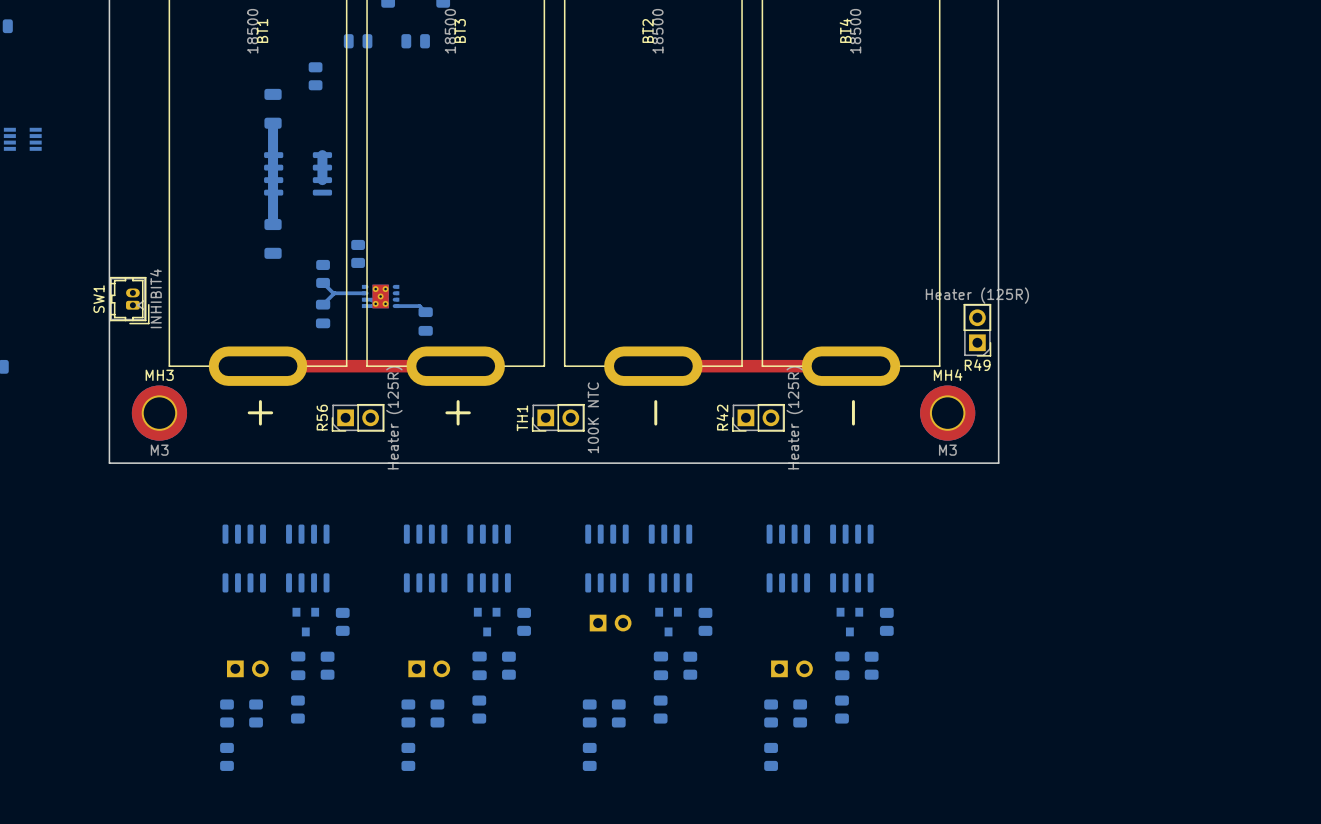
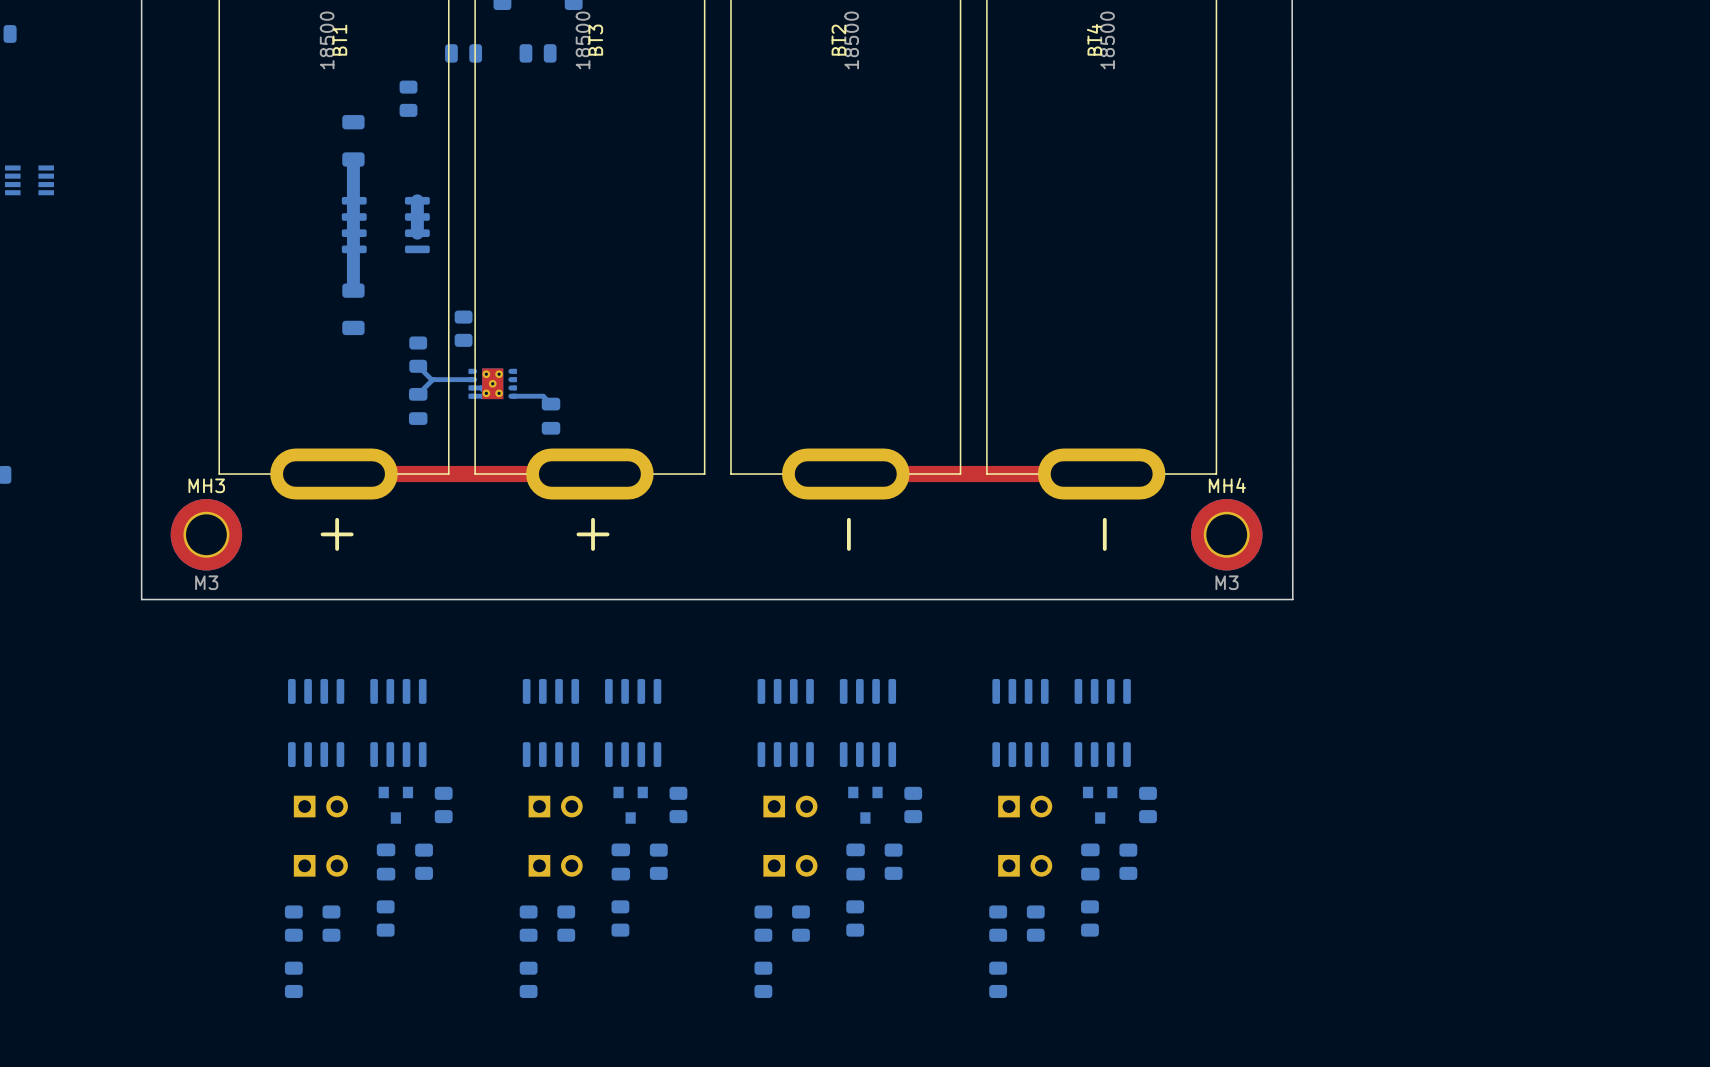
SW1: INHIBIT4 (129, 300) -> none
R49: Heater (125R) (977, 330) -> none
R56 side: top (358, 417) -> bottom (320, 806)
TH1 side: top (558, 417) -> bottom (555, 806)
R42: Heater (125R) (758, 417) -> none
part: none -> (1025, 806)
part: none -> (790, 865)

